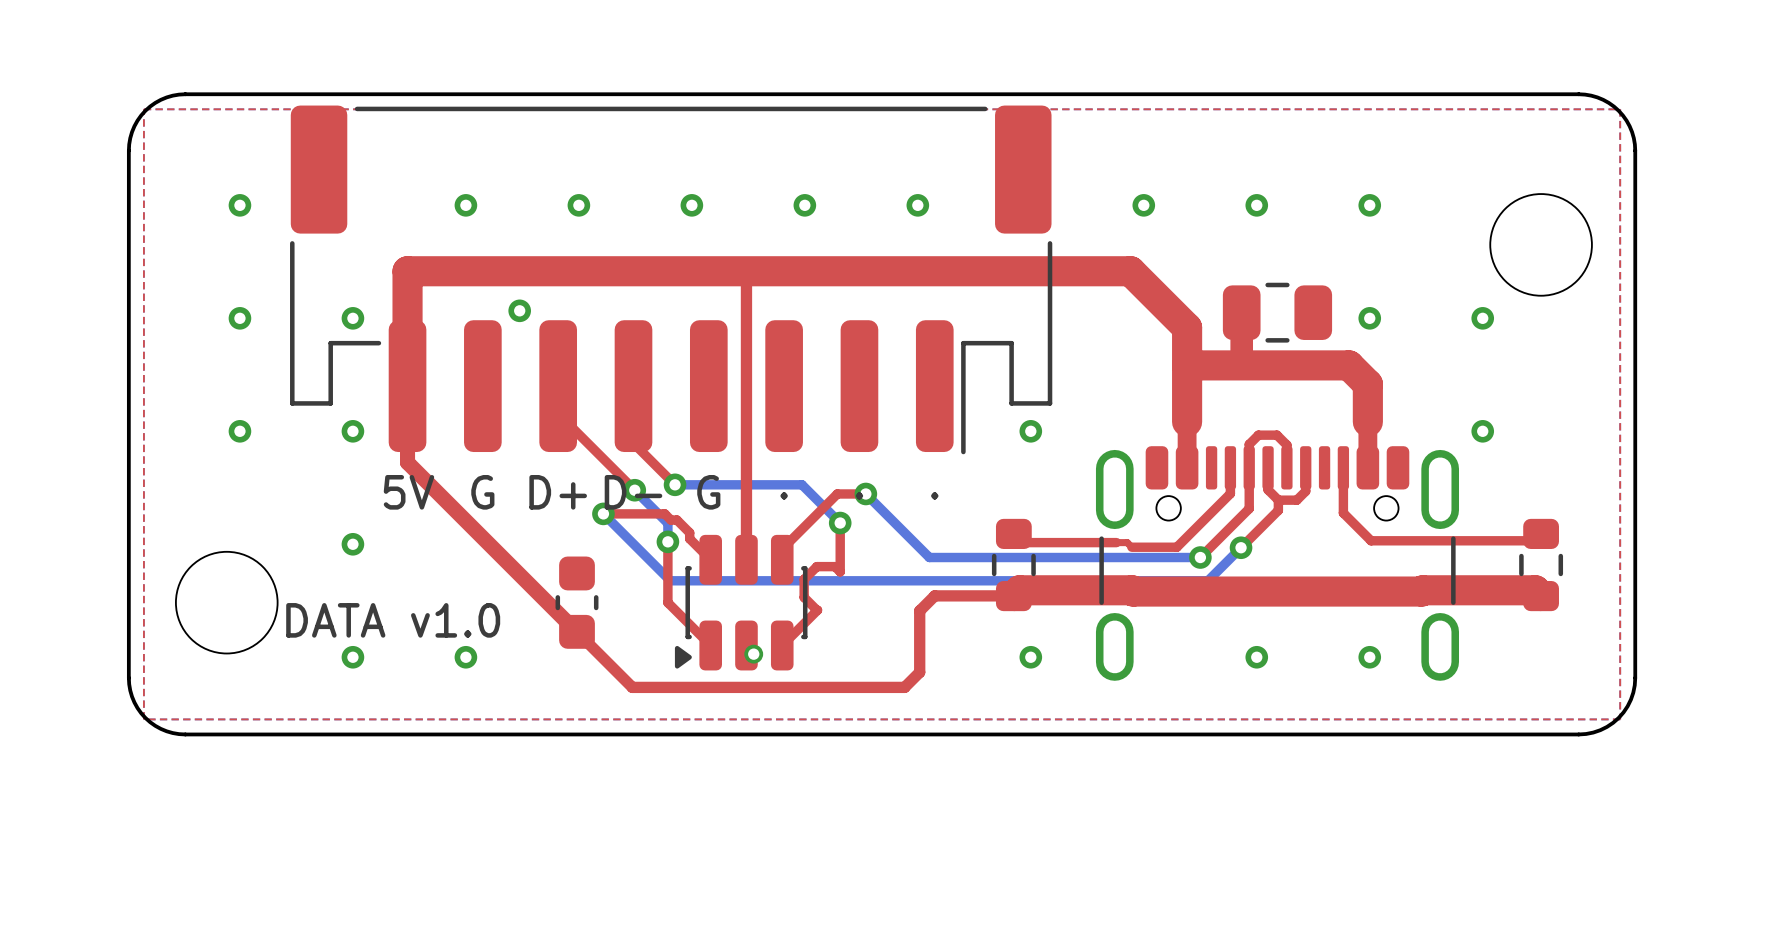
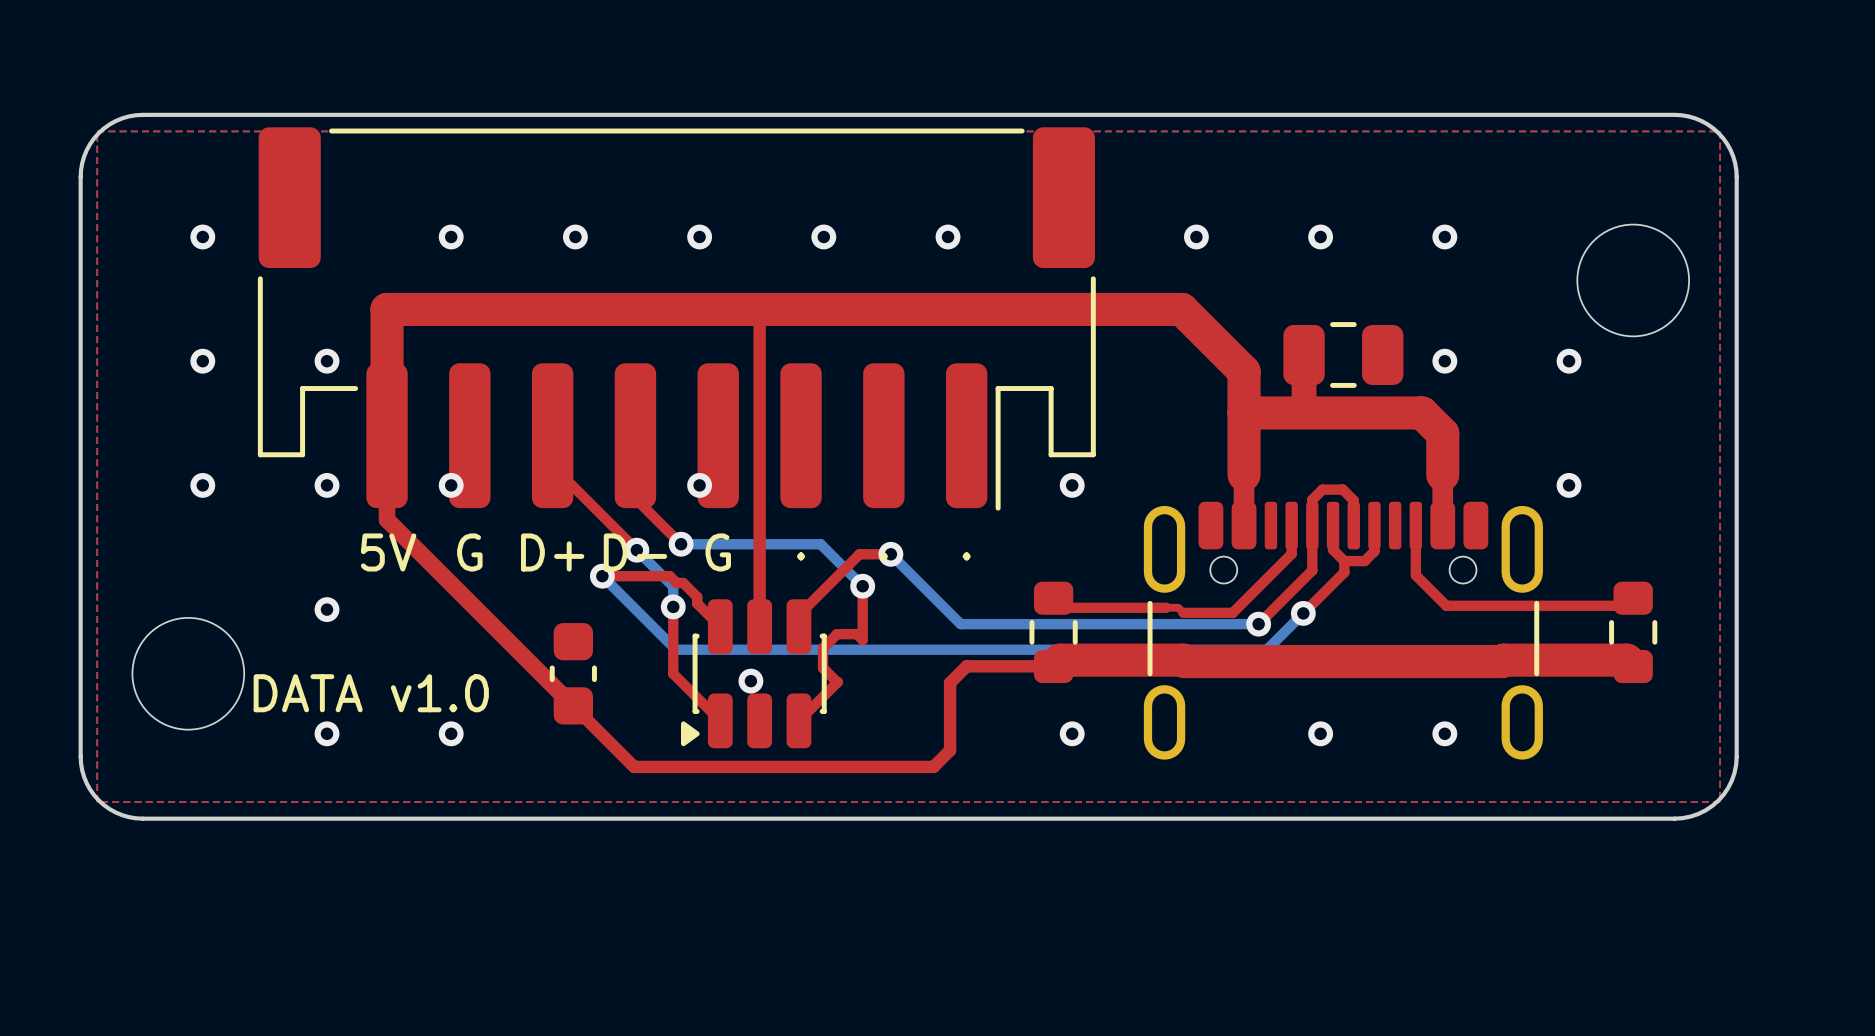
via: (519, 310) -> none
via: none -> (451, 485)
via: none -> (699, 485)
via: none -> (750, 681)
via: (753, 654) -> none

